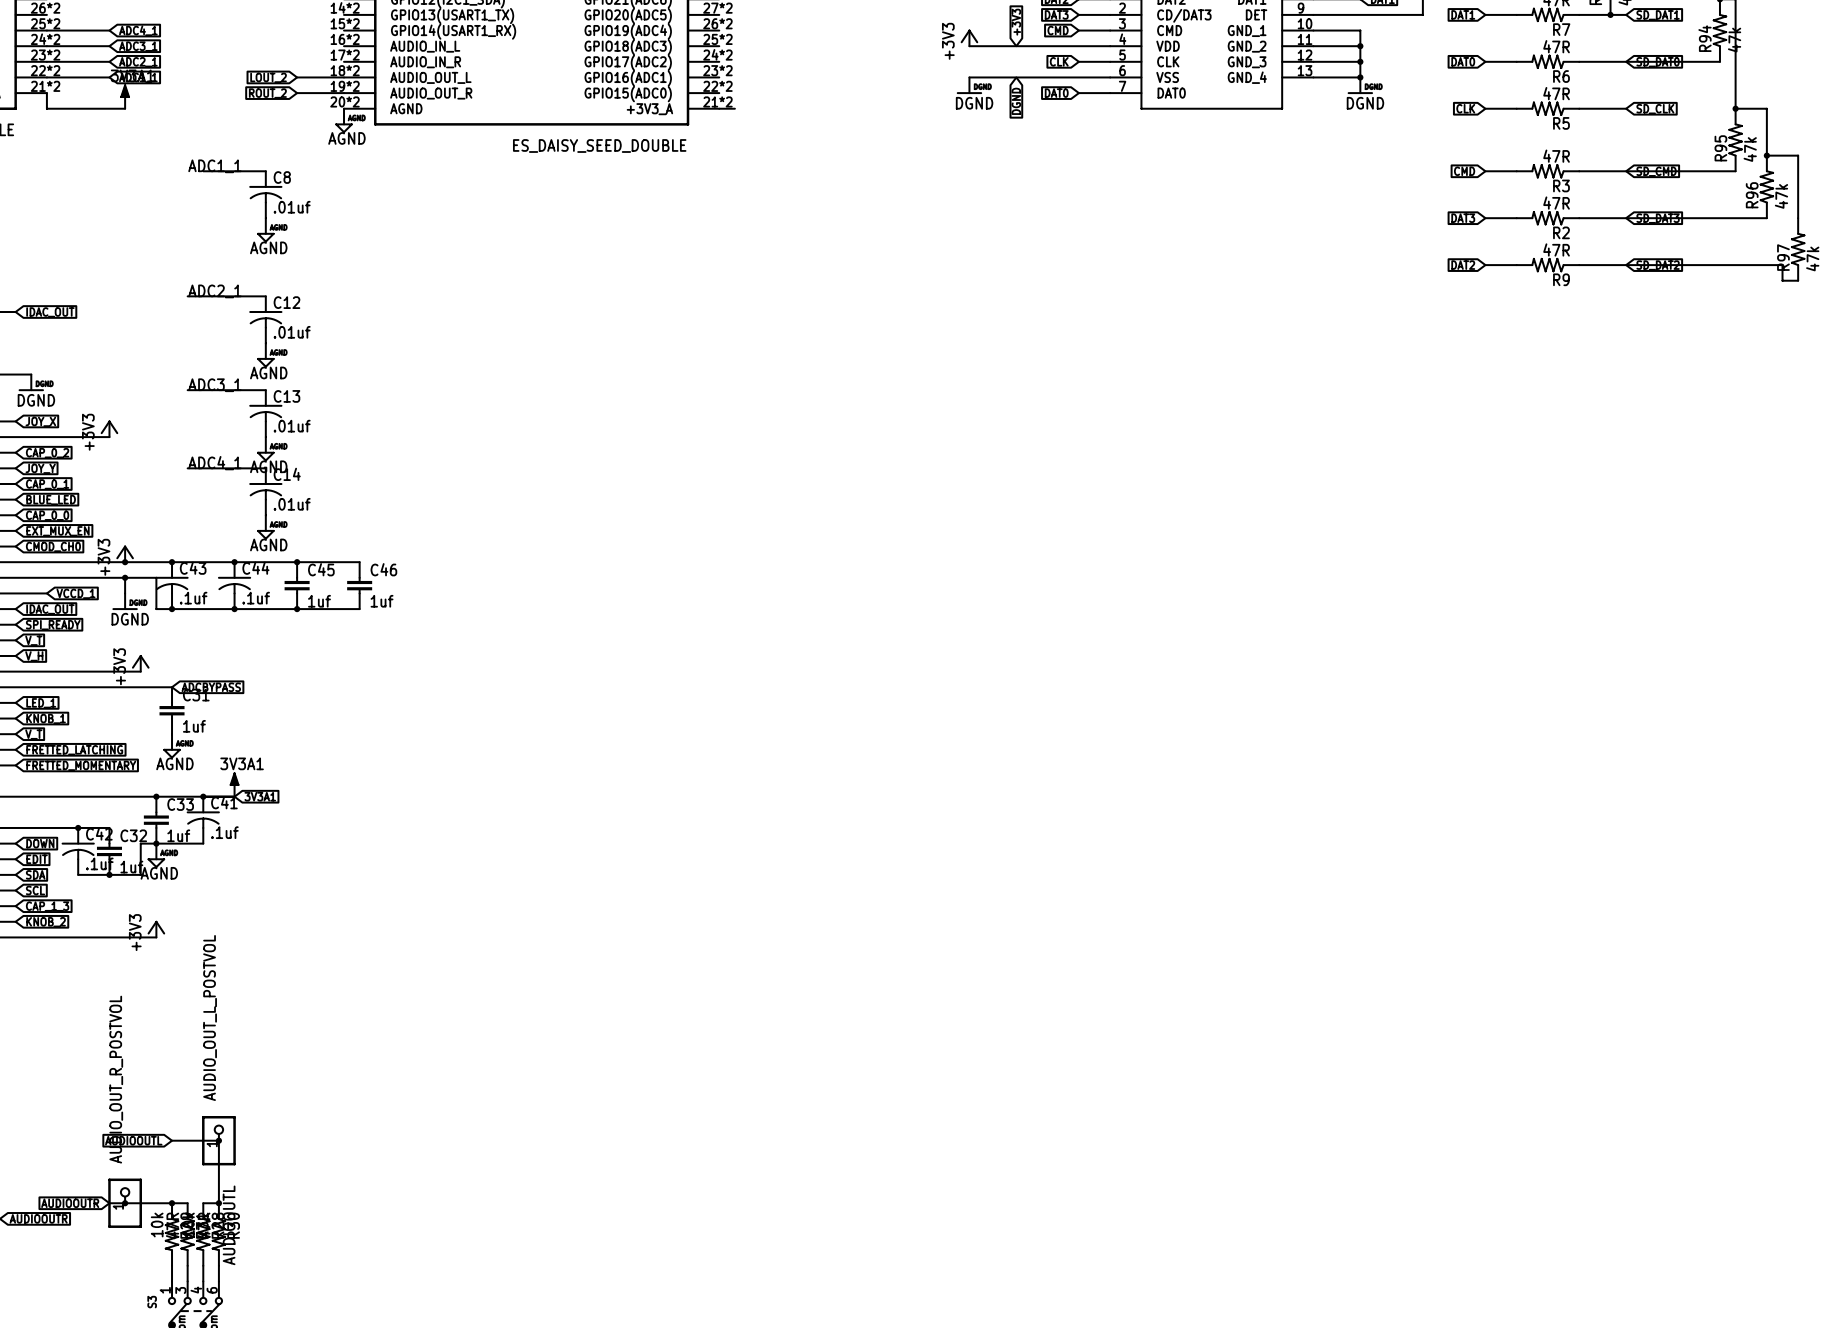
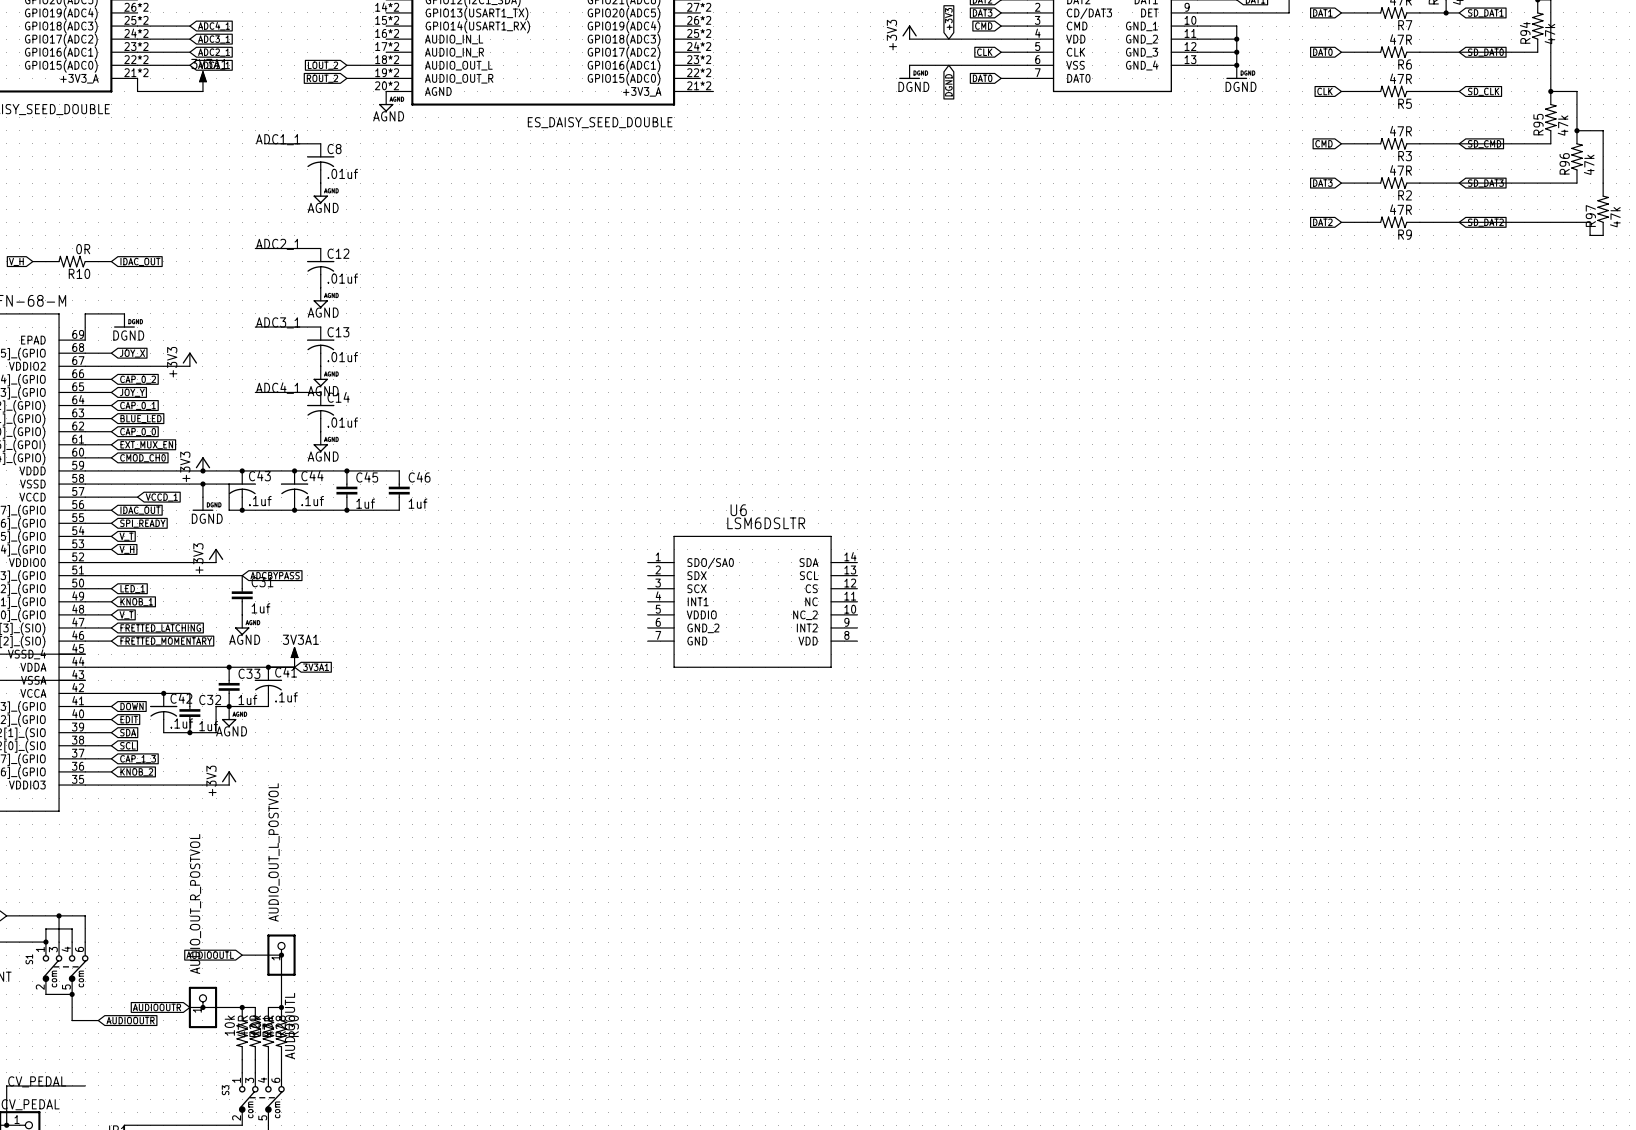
U6: none -> LSM6DSLTR (752, 601)

